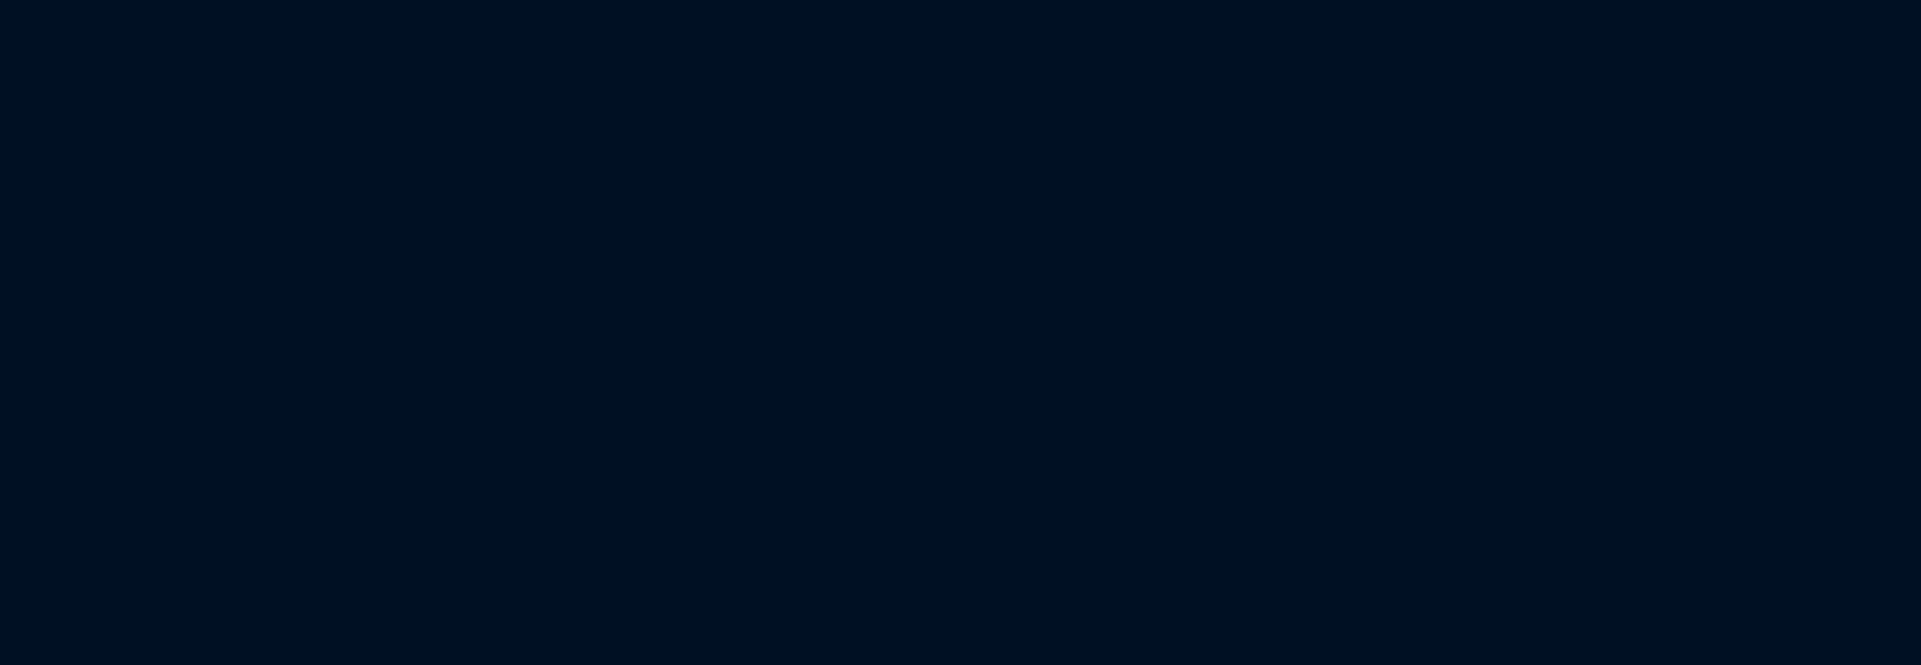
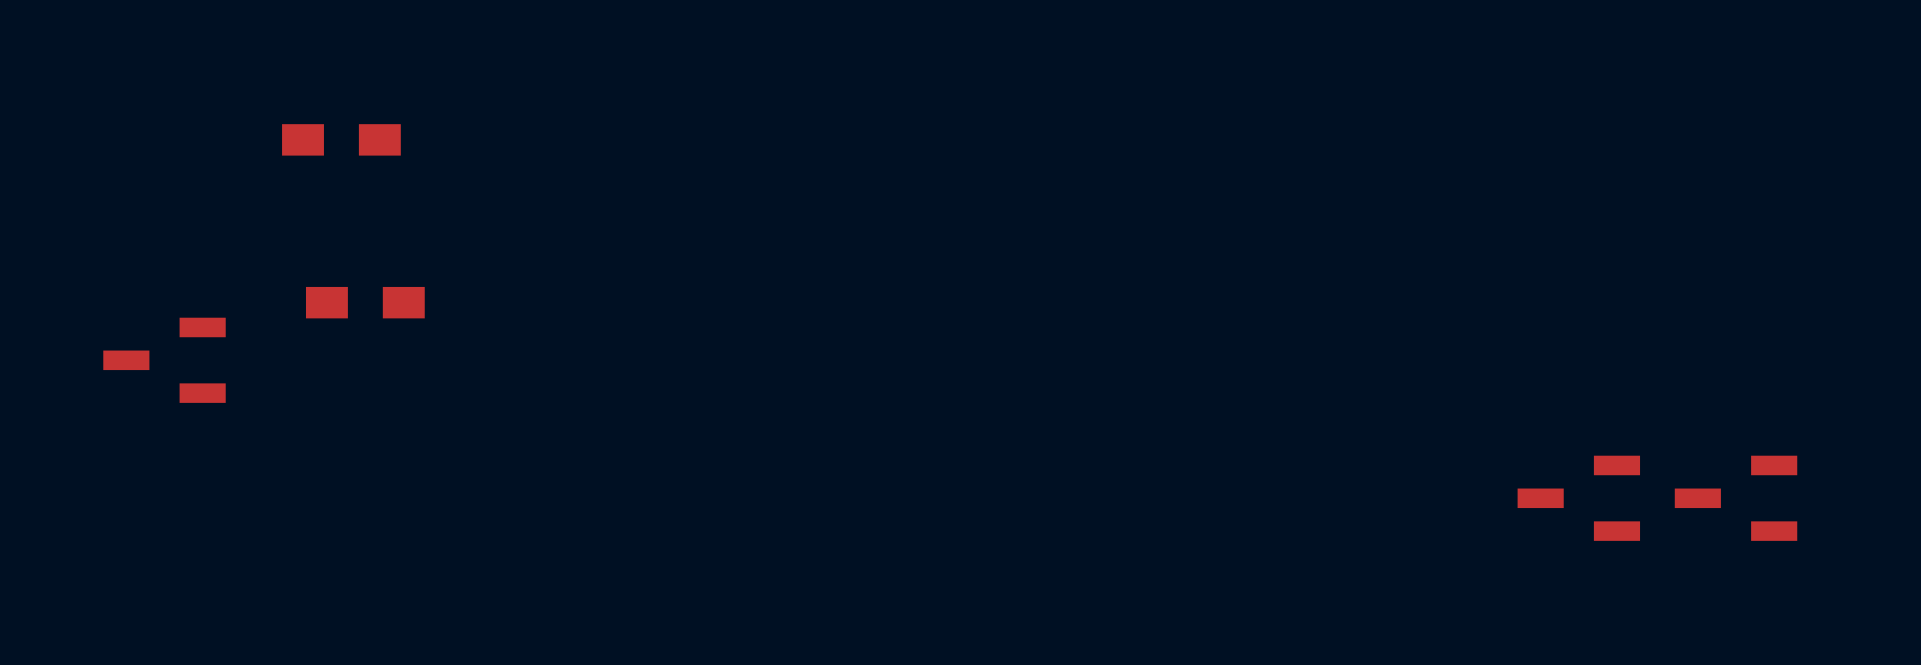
part: none -> (341, 139)
part: none -> (365, 302)
part: none -> (164, 360)
part: none -> (1578, 498)
part: none -> (1736, 498)

